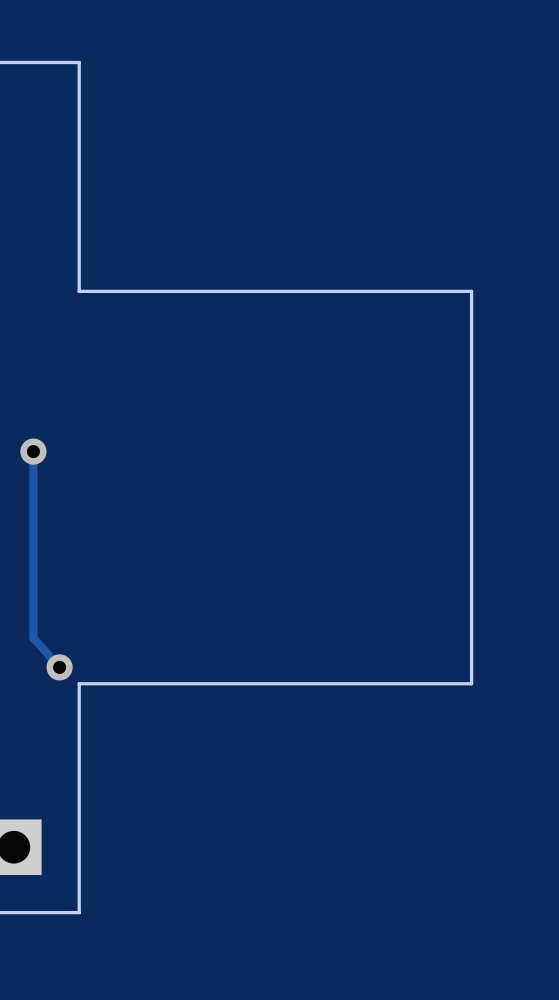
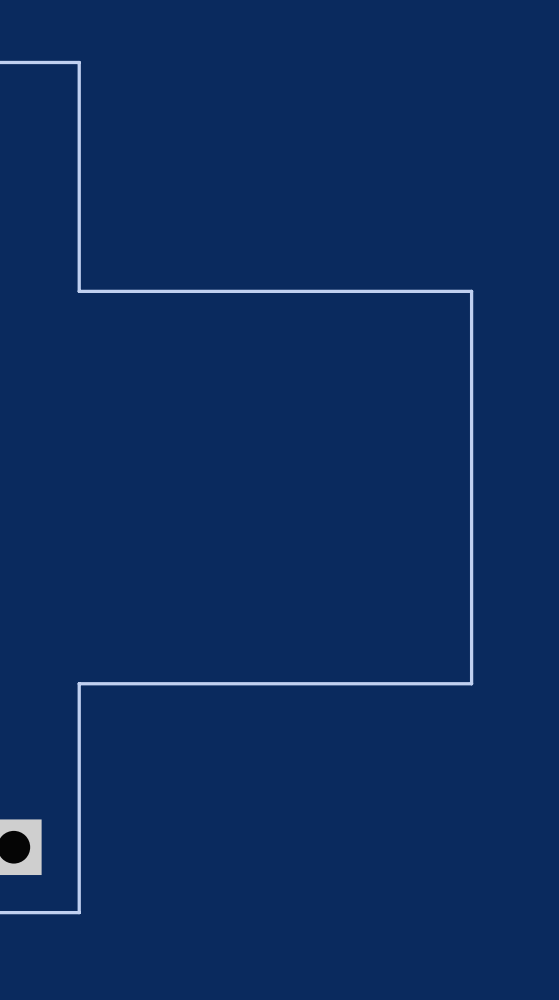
track: (33, 451) (33, 637) (59, 667) -> none
via: (33, 451) -> none
via: (59, 667) -> none

